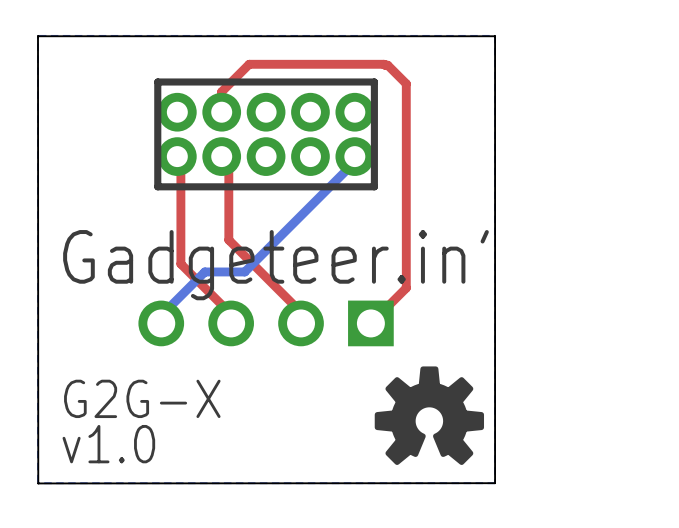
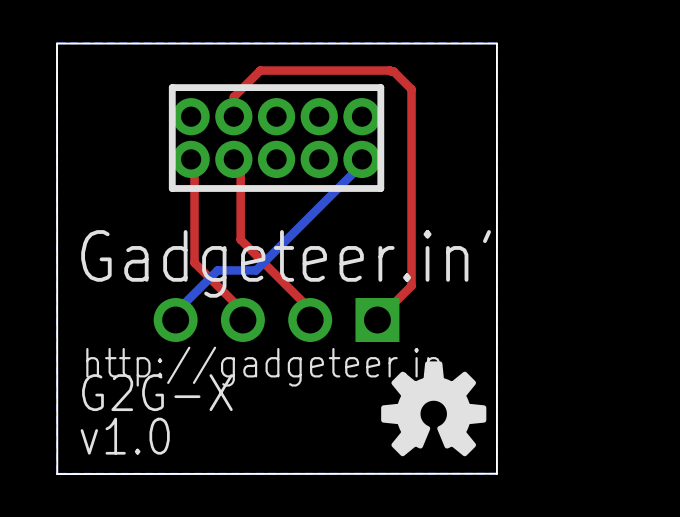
text: none -> http://gadgeteer.in (263, 366)

